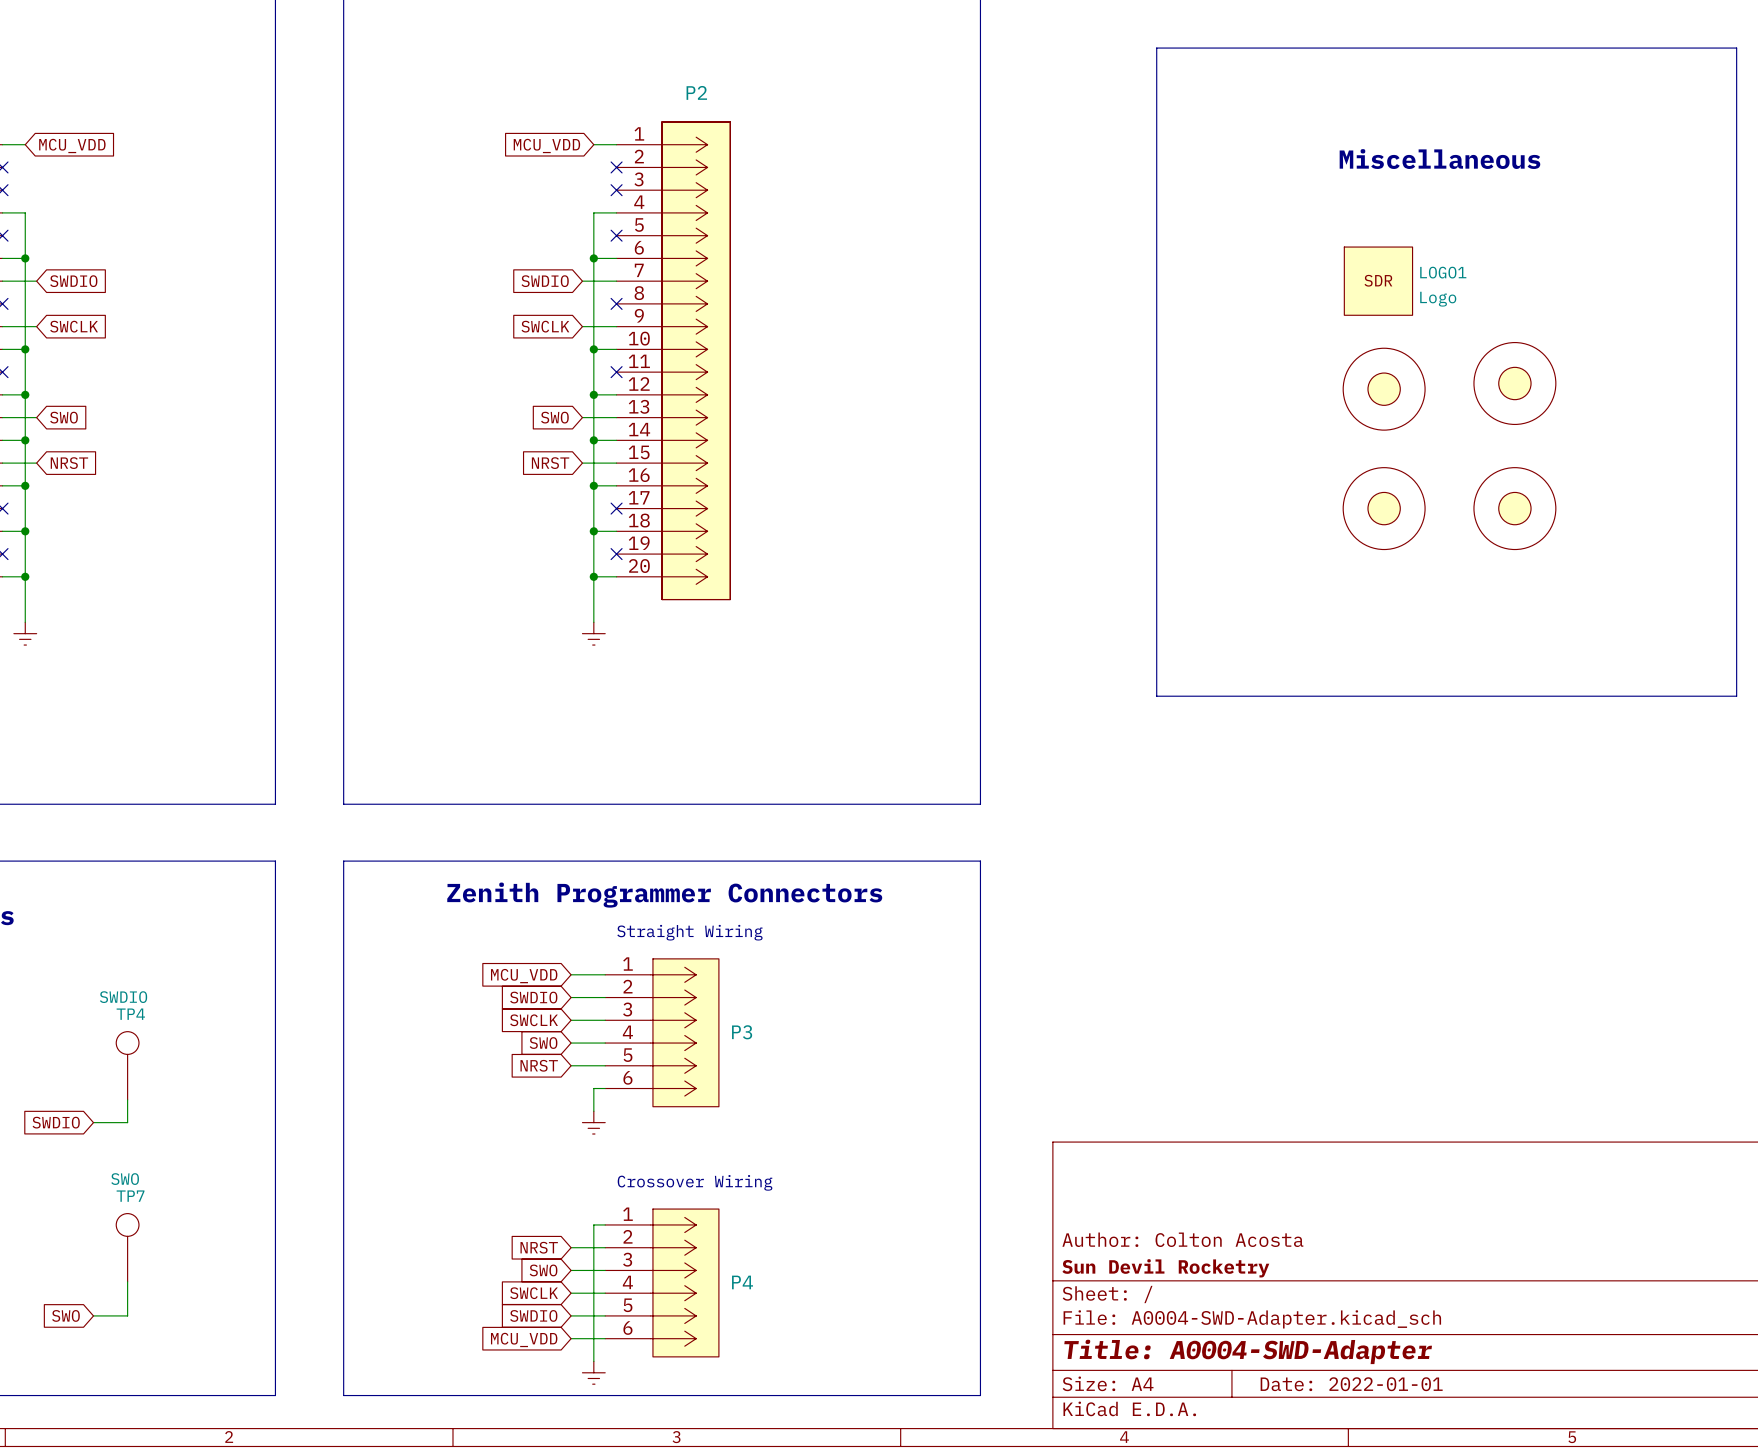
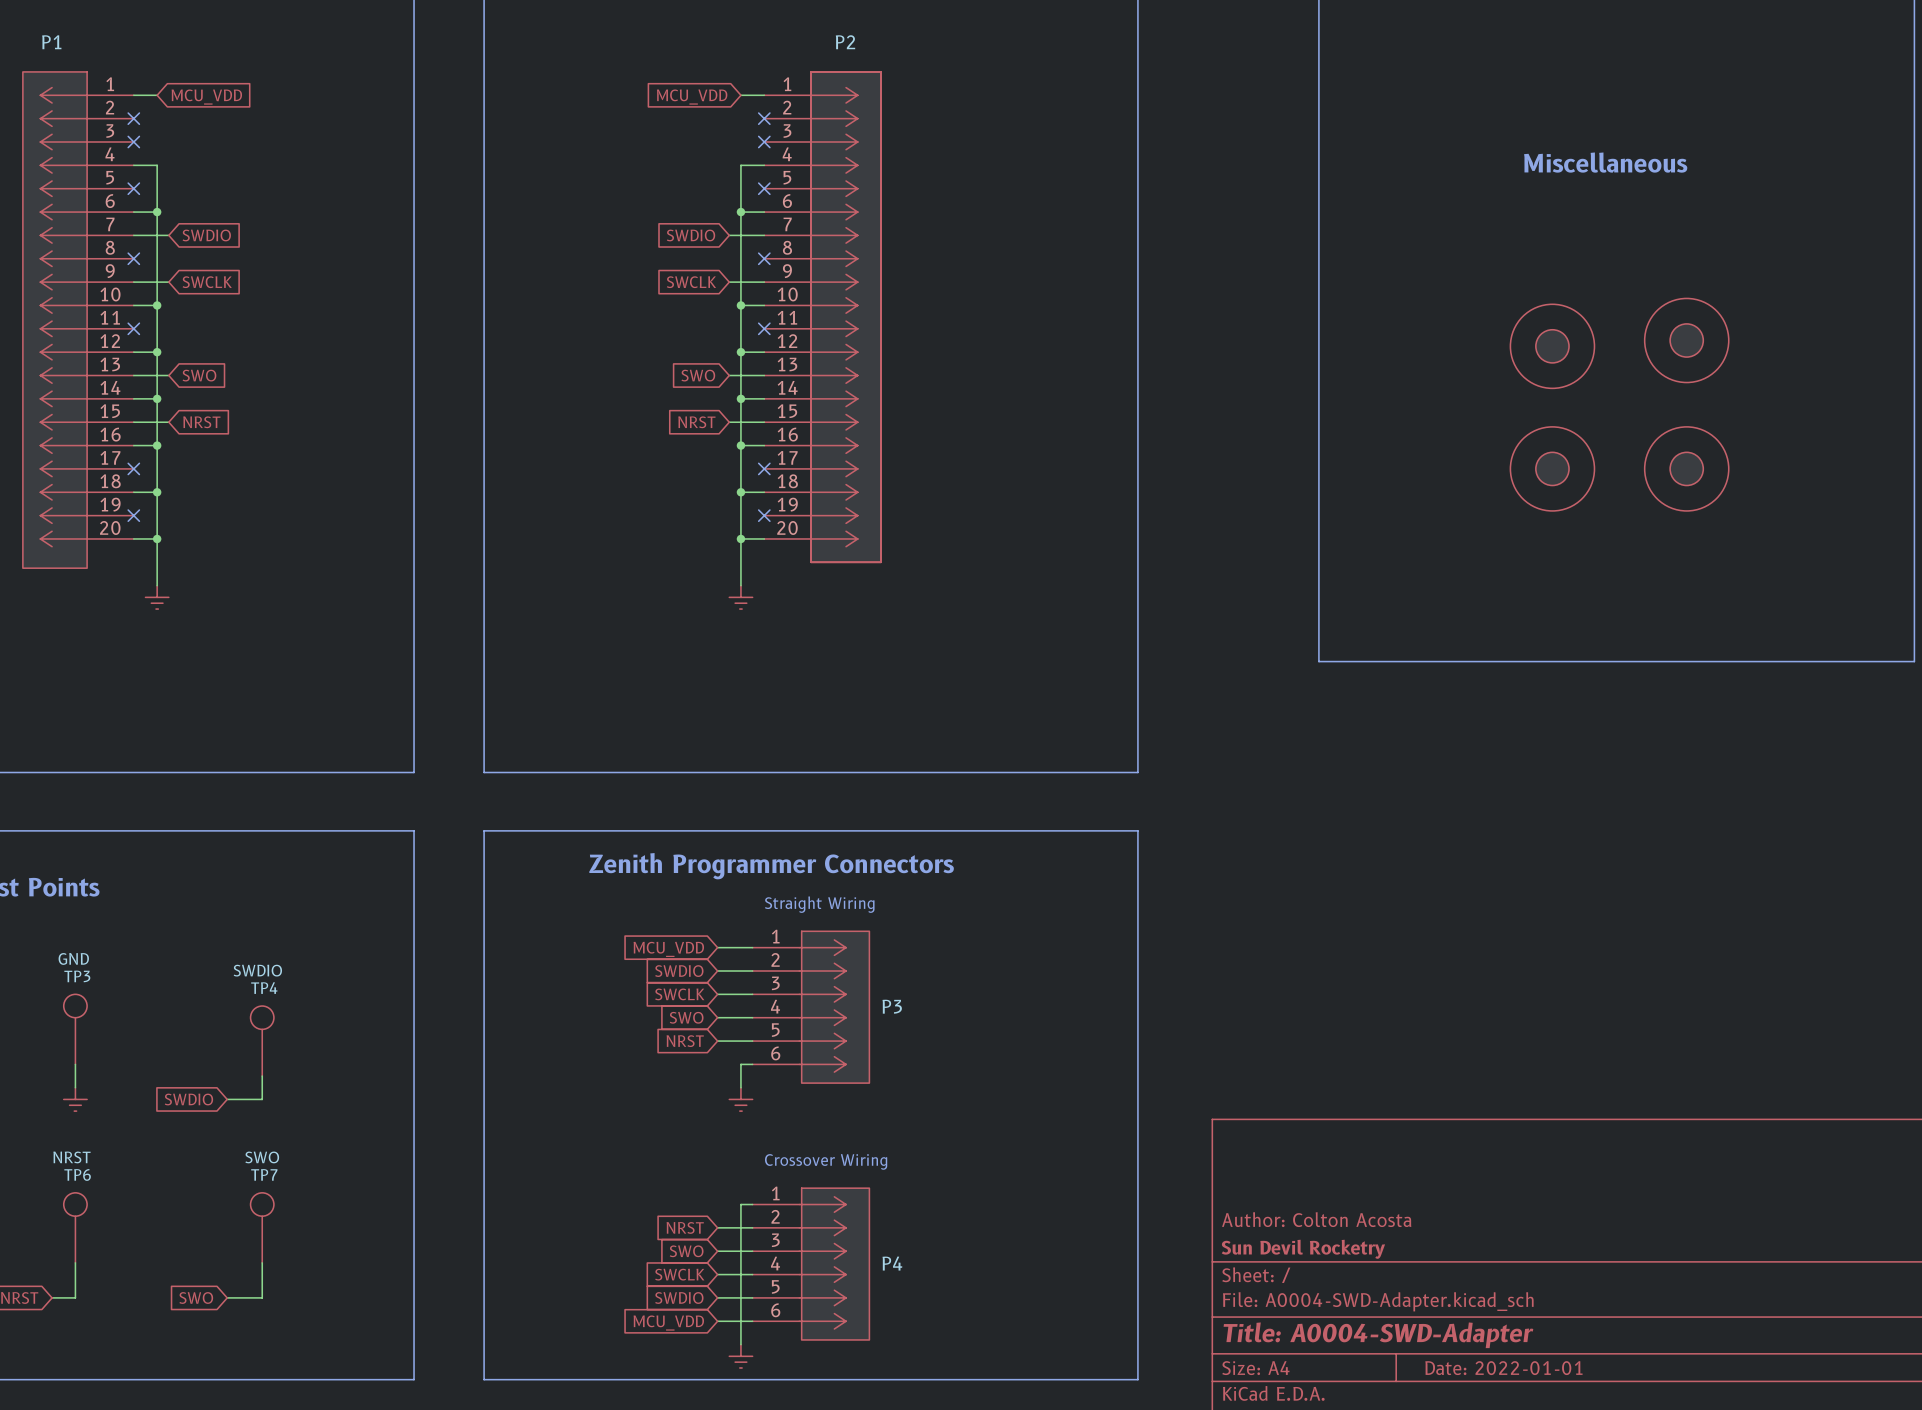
text position: Miscellaneous (1439, 159) -> Miscellaneous (1605, 162)
LOGO1: Logo (1378, 281) -> none

